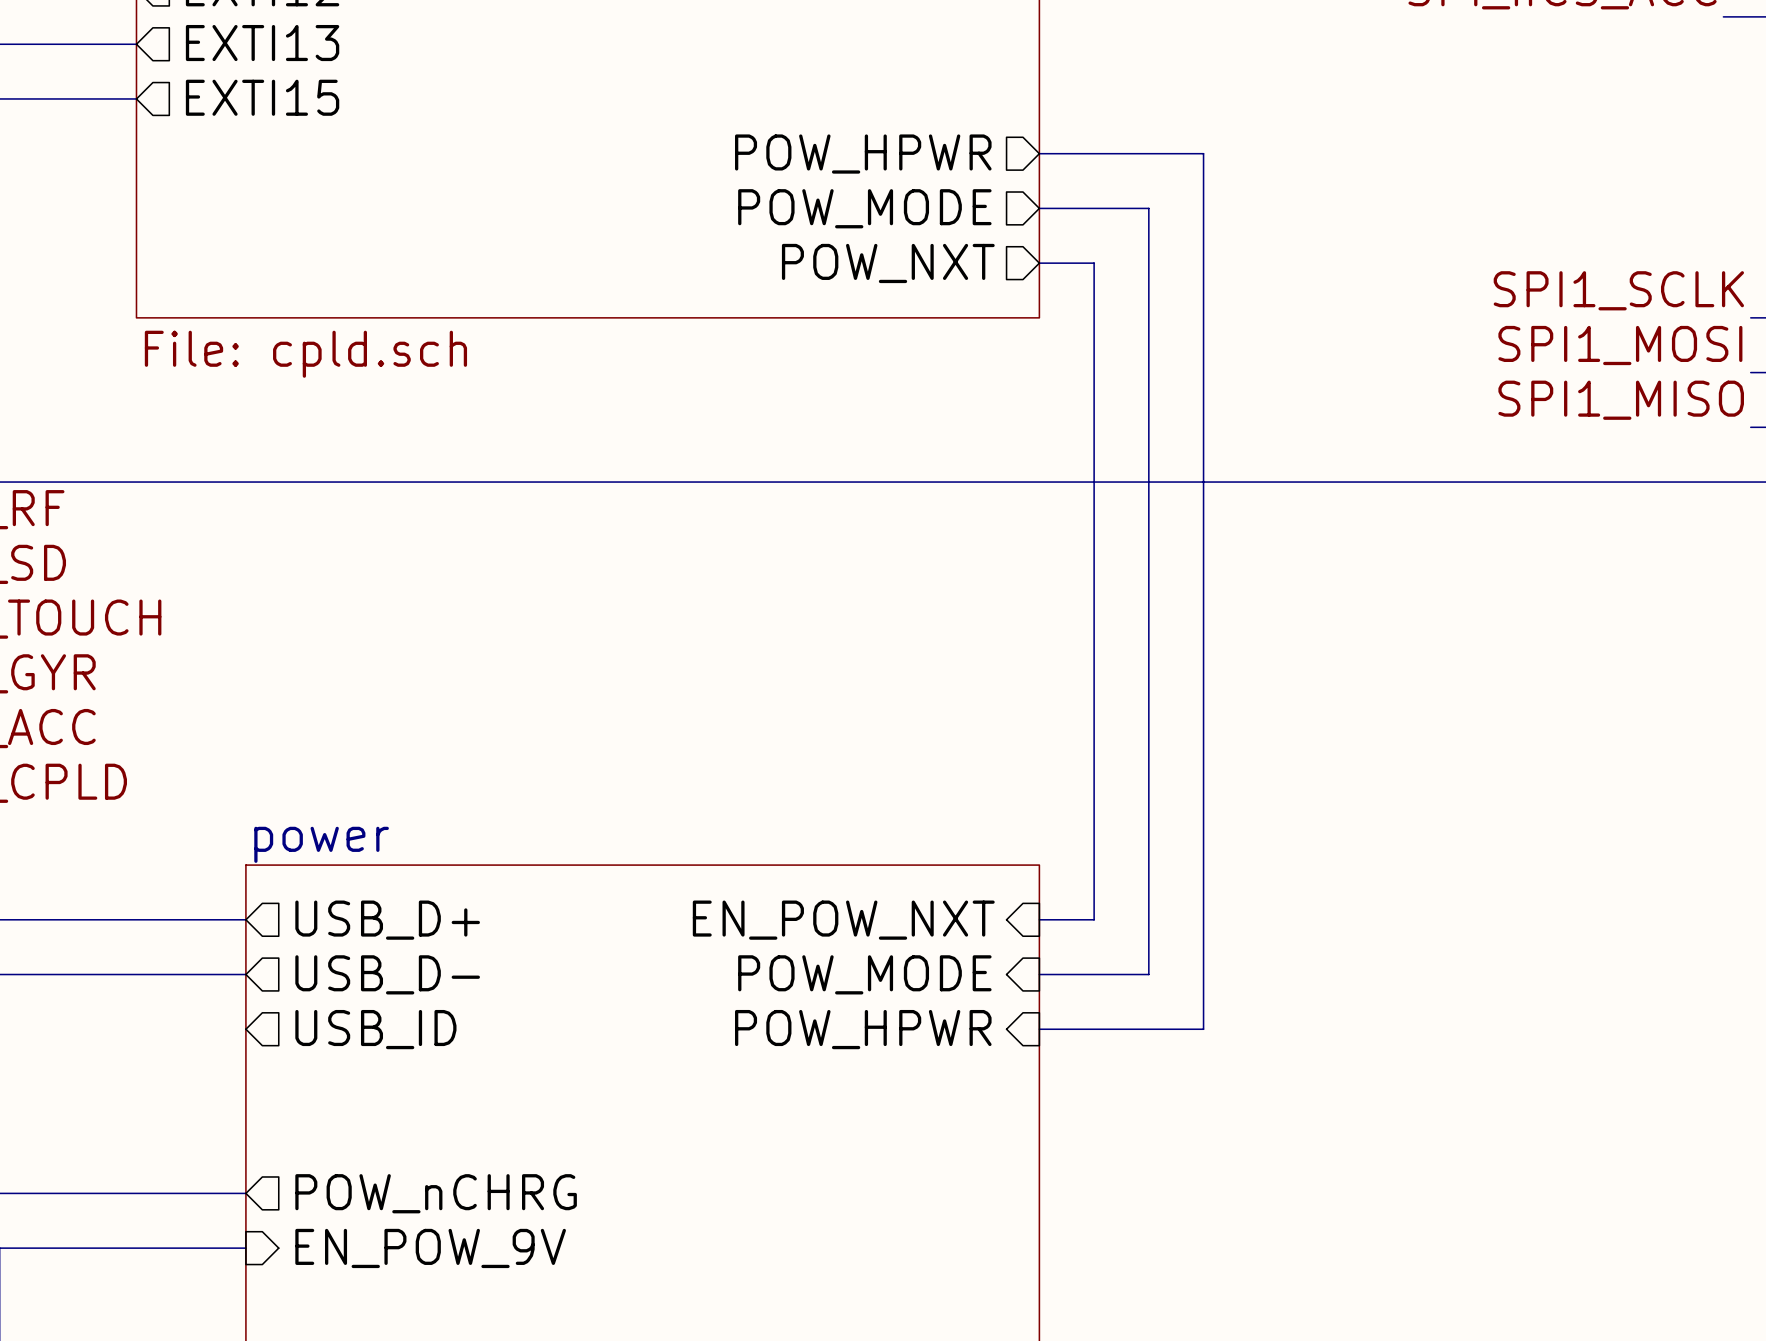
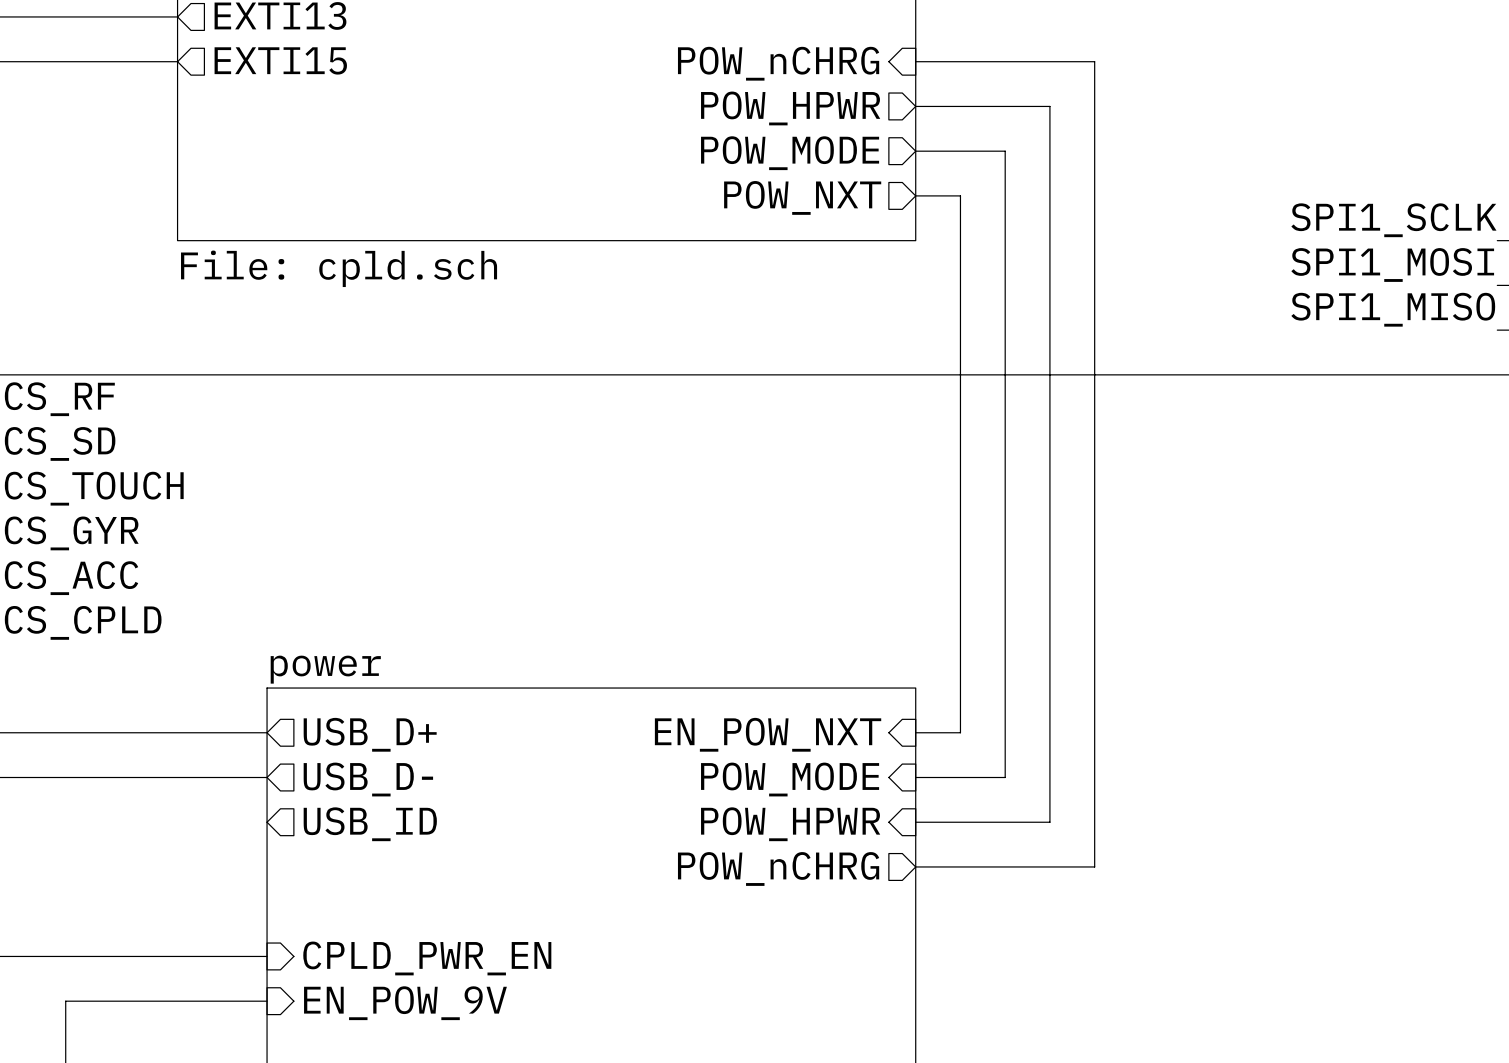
wire: none -> (915, 61) (1094, 61) (1094, 866) (915, 866)
sheet pin: none -> POW_nCHRG (778, 63)
sheet pin: none -> POW_nCHRG (778, 868)
sheet pin shape: output (436, 1193) -> input (427, 958)
sheet pin: POW_nCHRG (436, 1193) -> CPLD_PWR_EN (427, 958)

